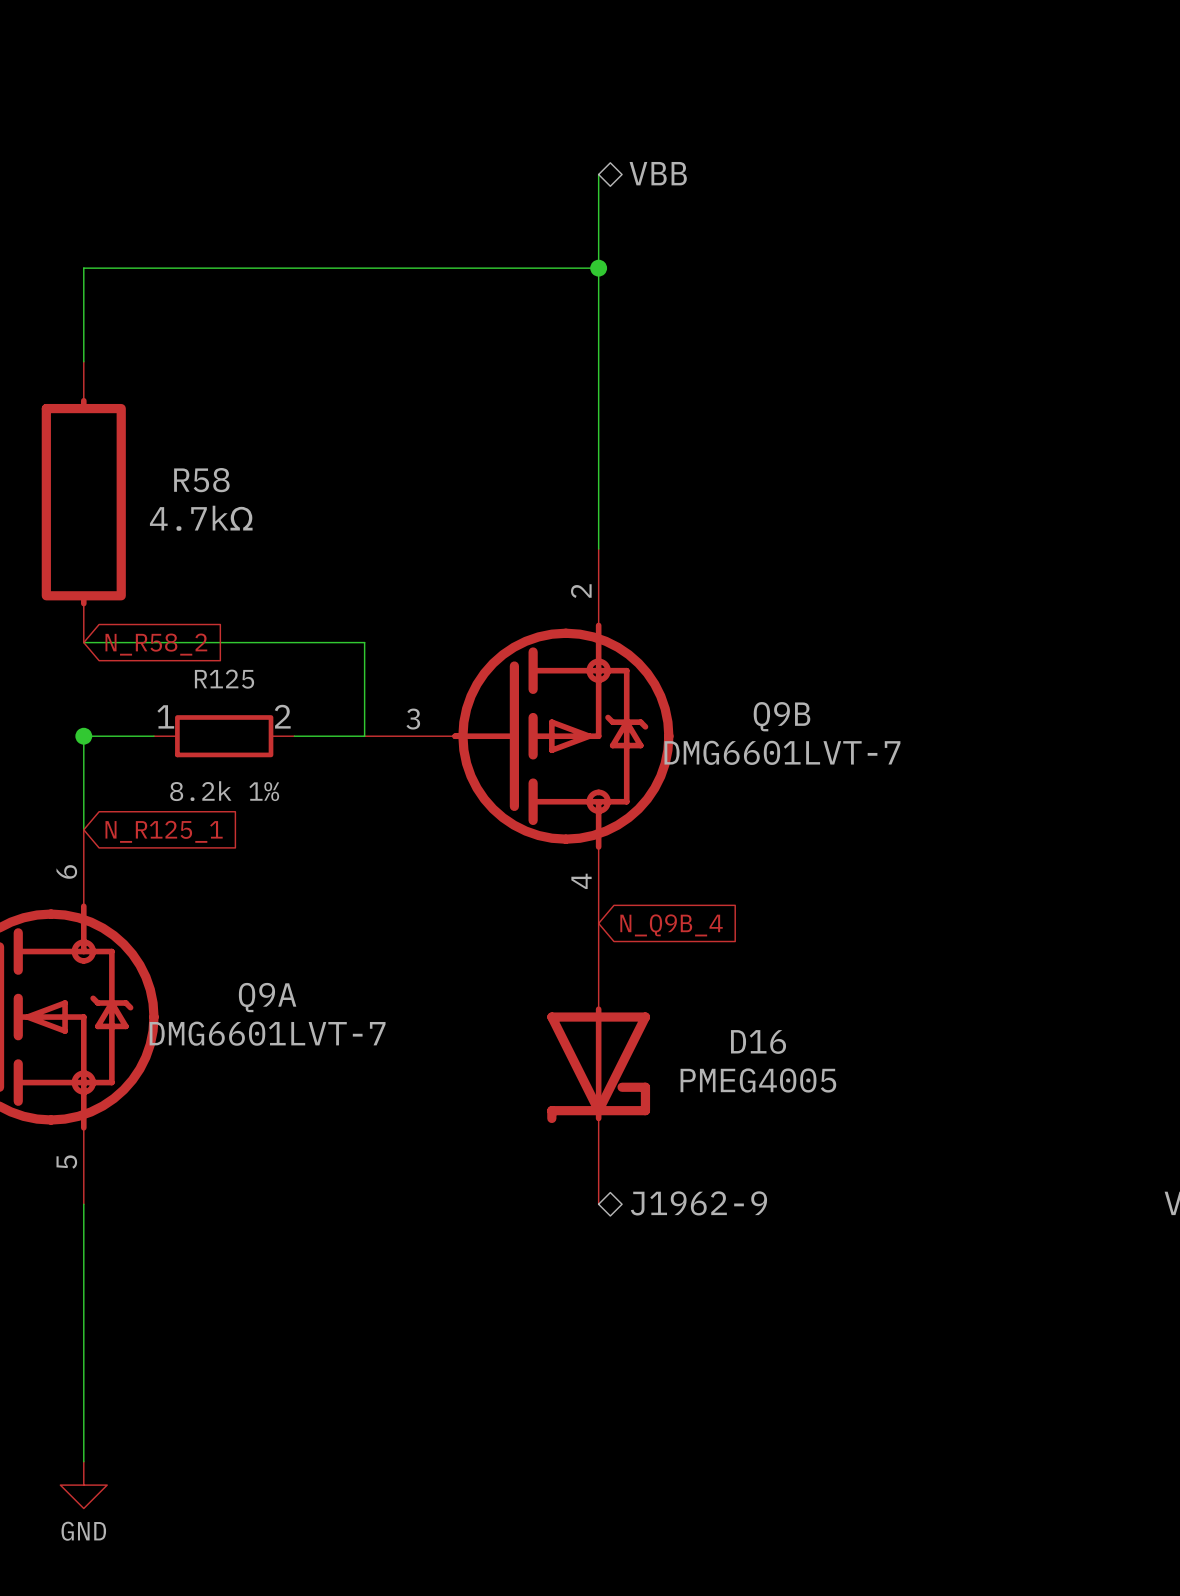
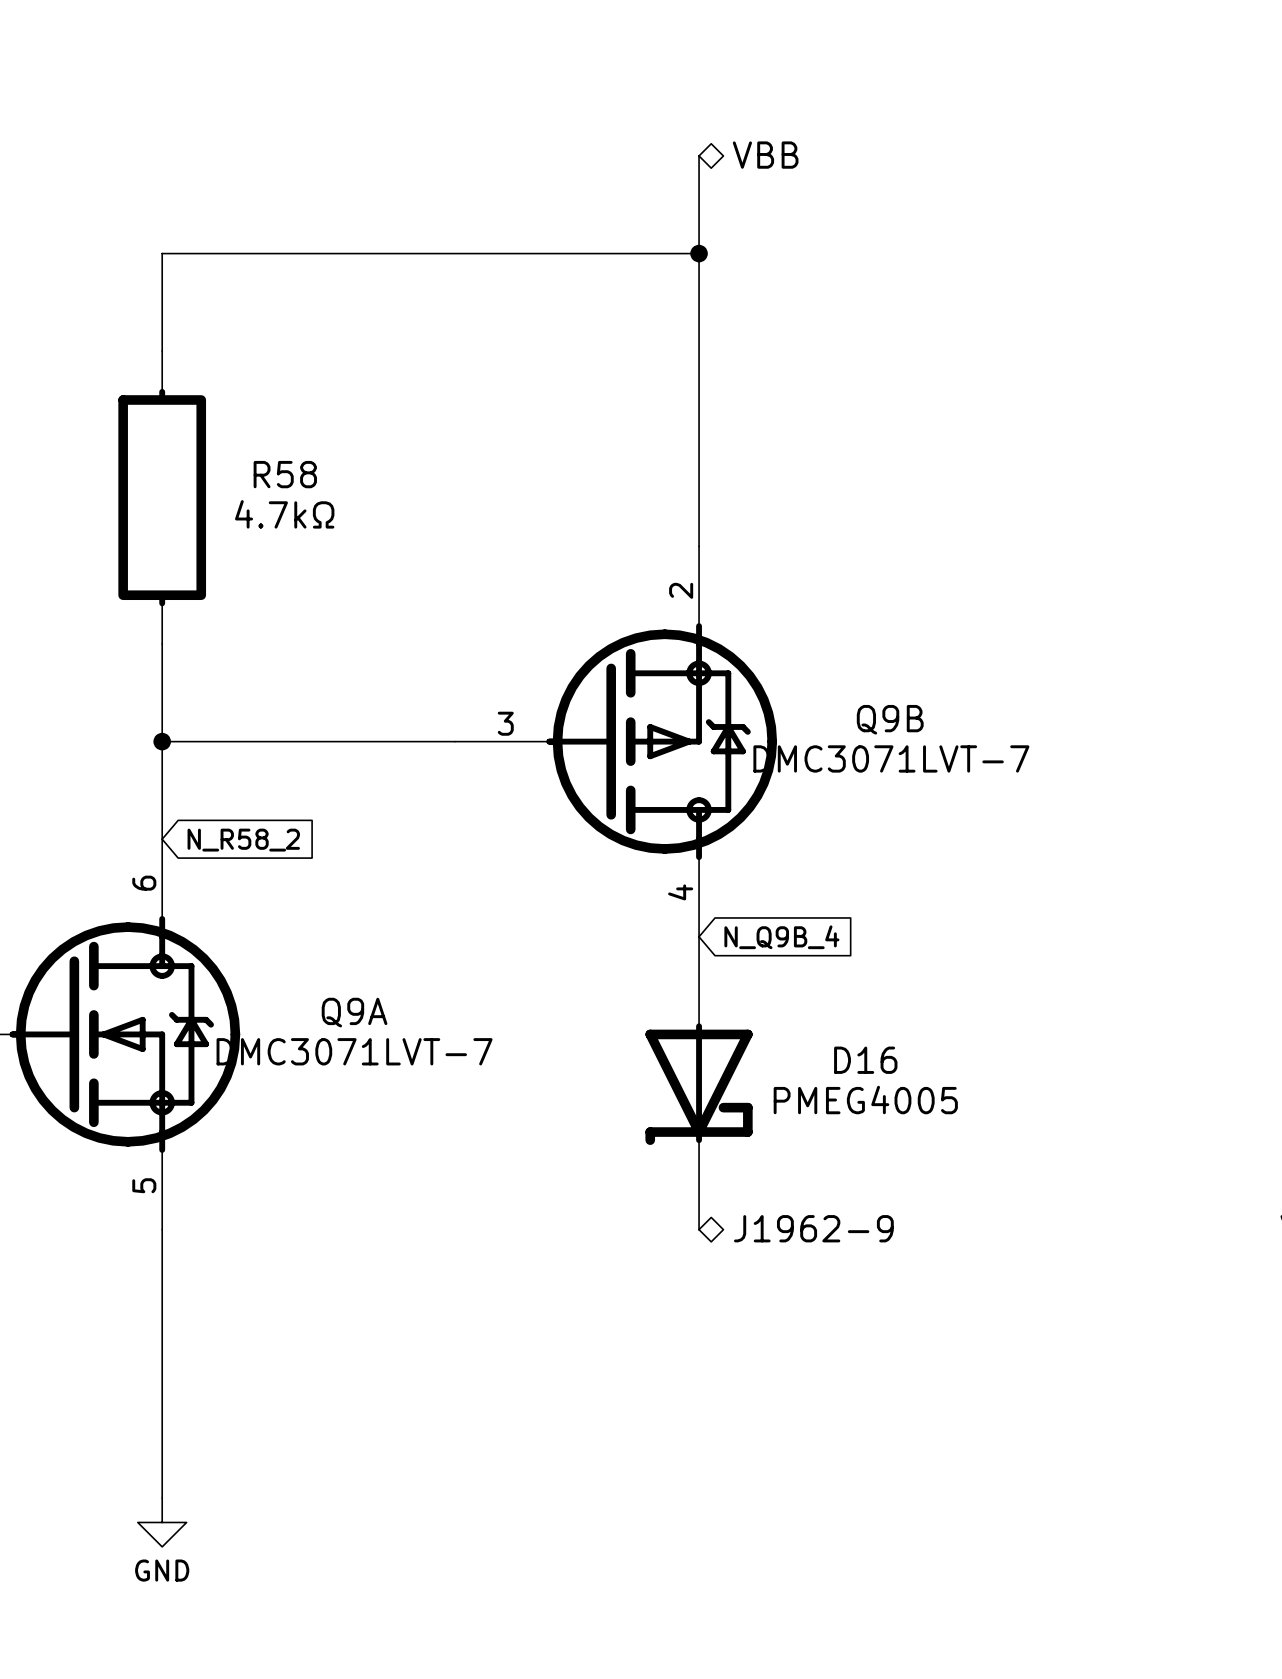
wire: (83, 642) (364, 642) (364, 736) -> (162, 644) (162, 741)
global label: N_R58_2 (156, 644) -> none
wire: none -> (235, 741) (381, 741)
R125: 8.2k 1% (224, 736) -> none
Q9B value: DMG6601LVT-7 (782, 752) -> DMC3071LVT-7 (891, 758)
global label: N_R125_1 (164, 831) -> N_R58_2 (243, 840)
Q9A value: DMG6601LVT-7 (267, 1033) -> DMC3071LVT-7 (354, 1051)

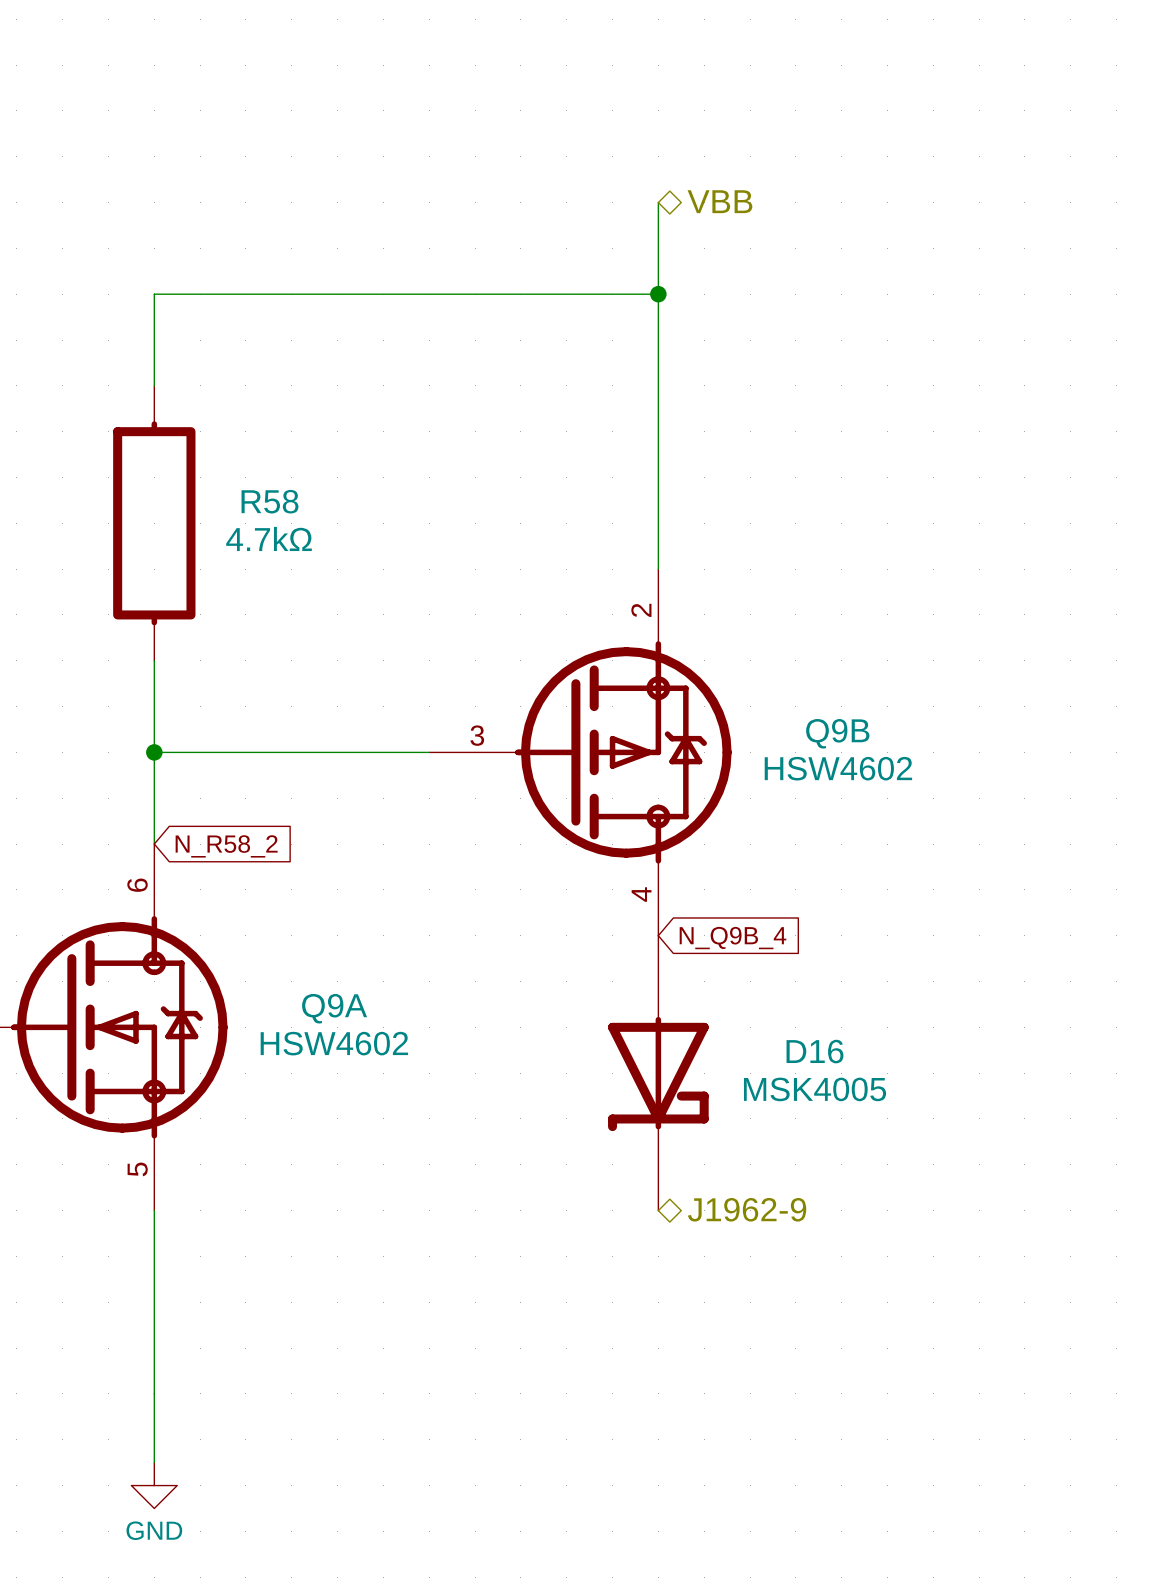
Q9B value: DMC3071LVT-7 (891, 758) -> HSW4602 (838, 768)
Q9A value: DMC3071LVT-7 (354, 1051) -> HSW4602 (334, 1043)
D16 value: PMEG4005 (865, 1100) -> MSK4005 (815, 1089)

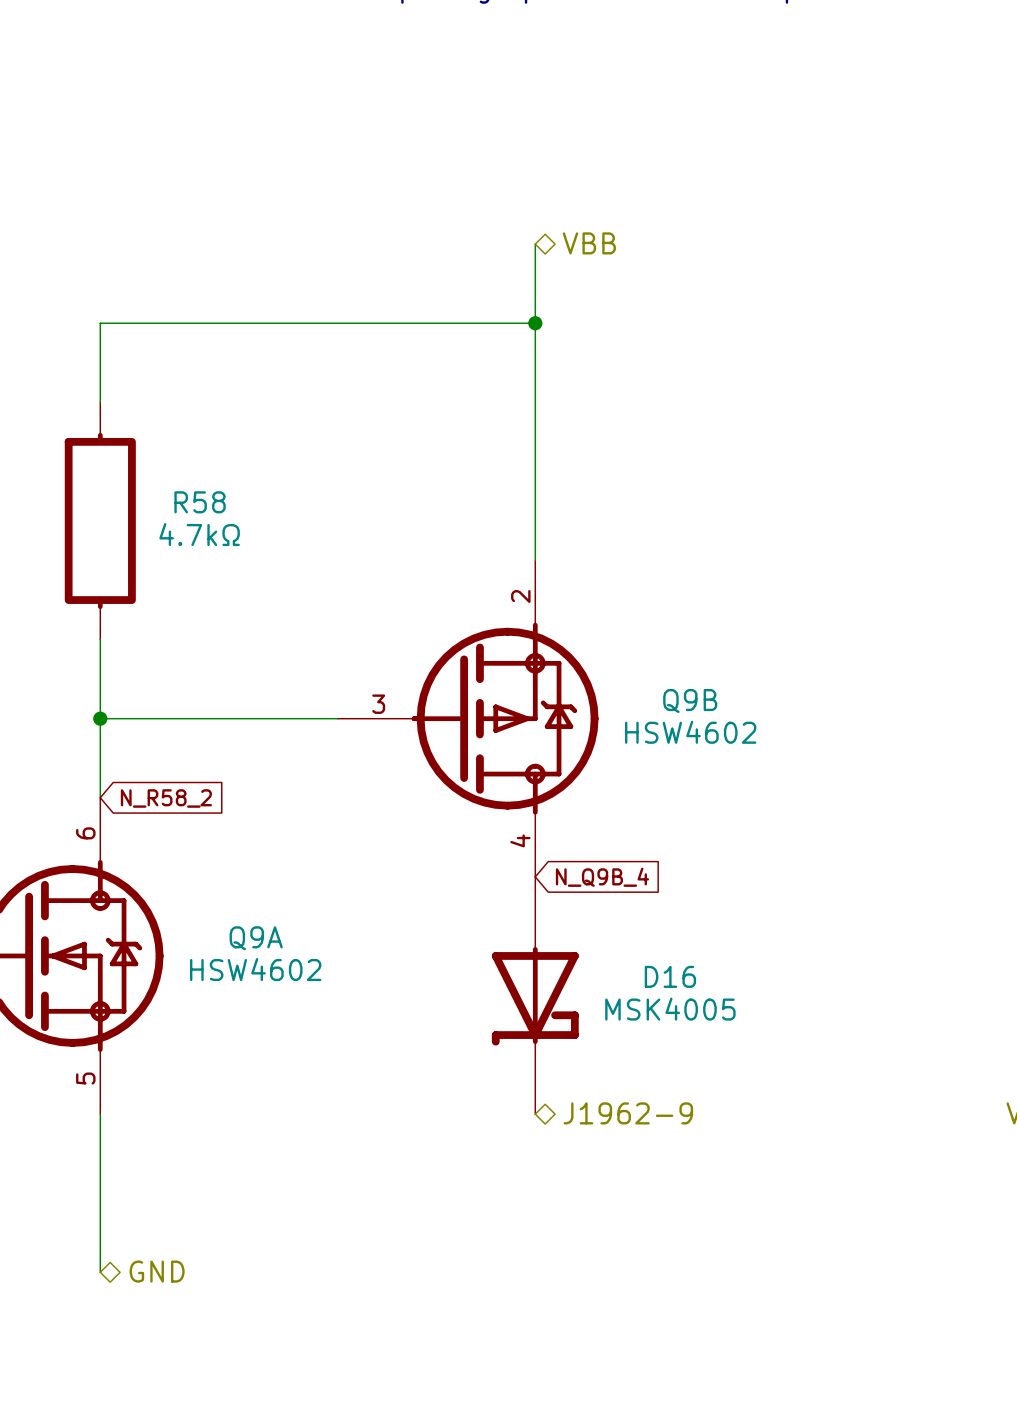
wire: (154, 1393) (154, 1462) -> none
hierarchical label: none -> GND (157, 1271)
power symbol: GND (154, 1485) -> none

